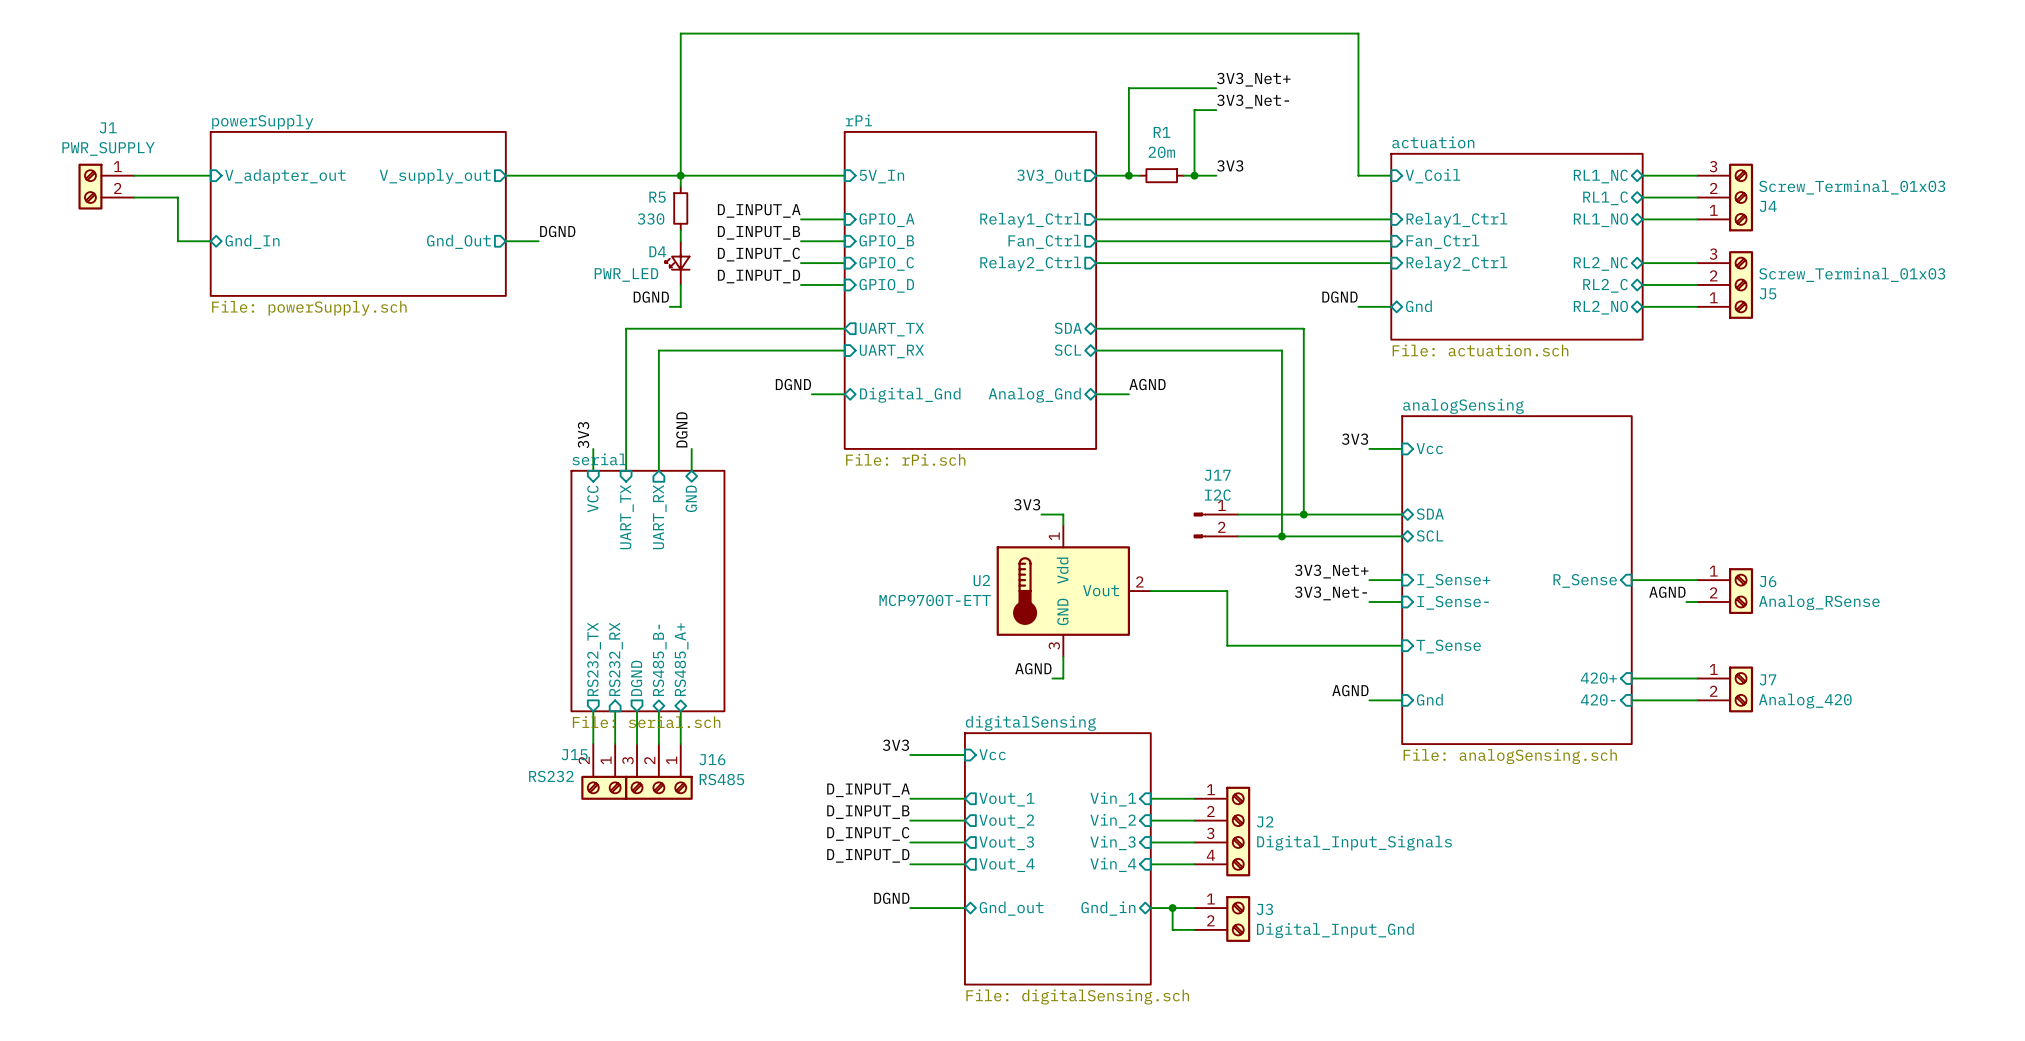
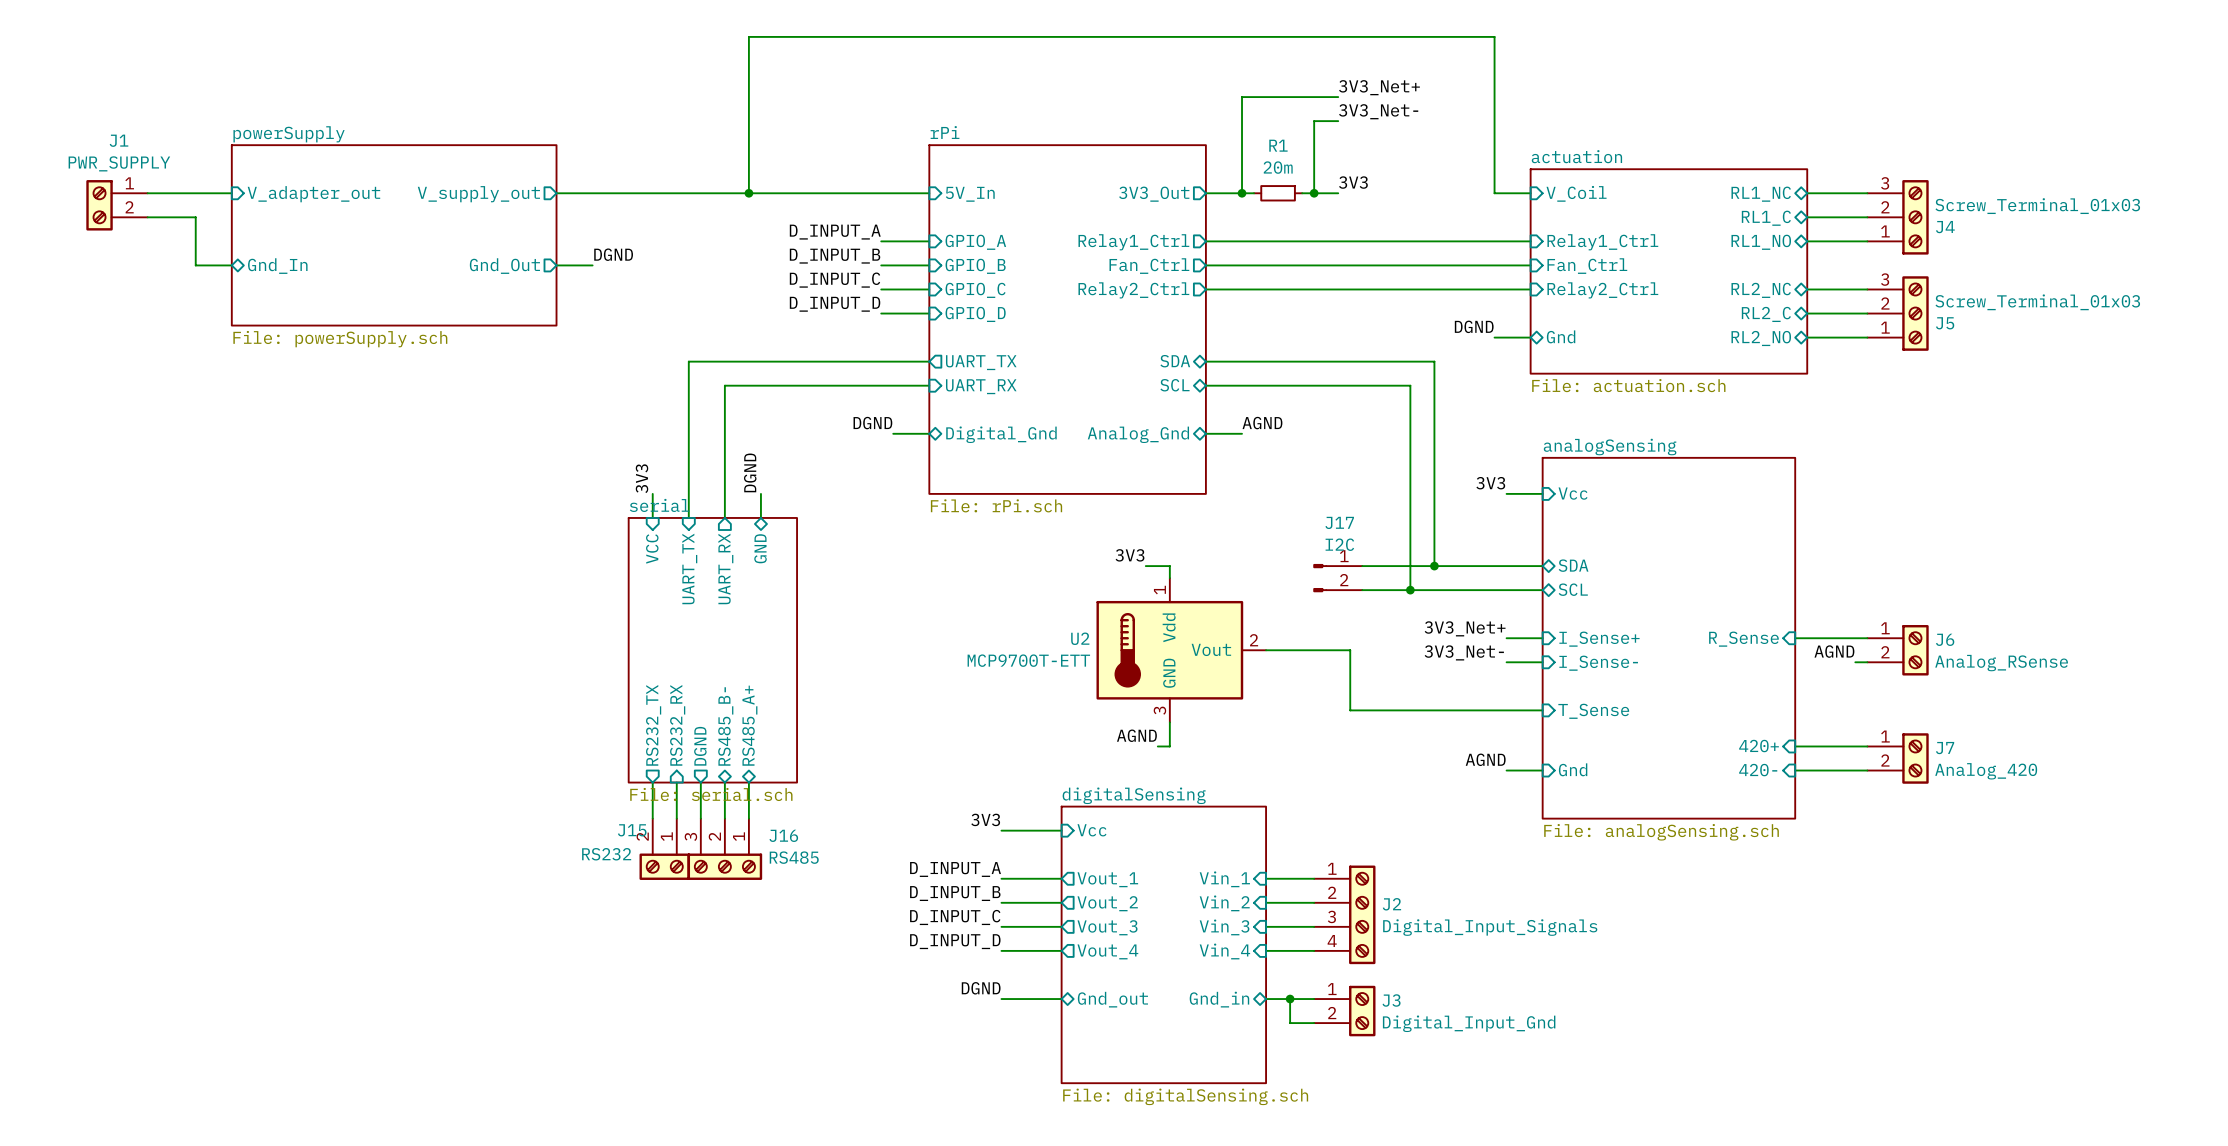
wire: (680, 175) (680, 186) -> none
R5: 330 (680, 208) -> none
wire: (680, 230) (680, 241) -> none
D4: PWR_LED (677, 263) -> none
wire: (680, 284) (680, 306) (669, 306) -> none
label: DGND (651, 297) -> none

